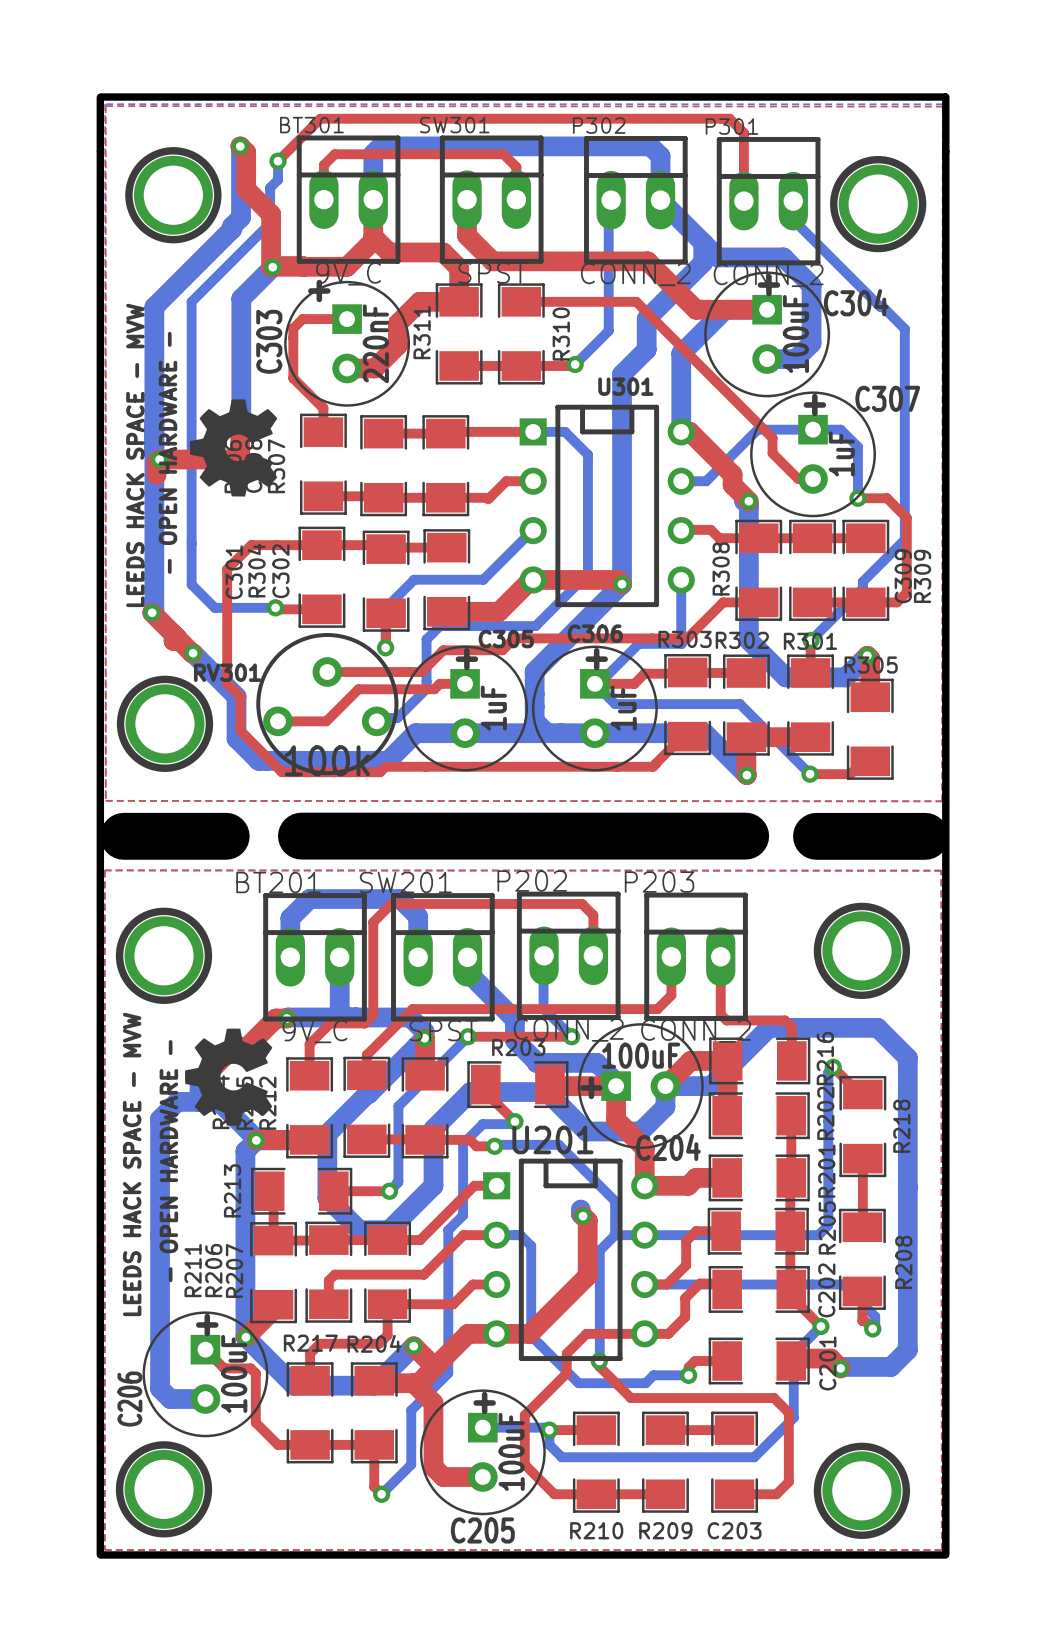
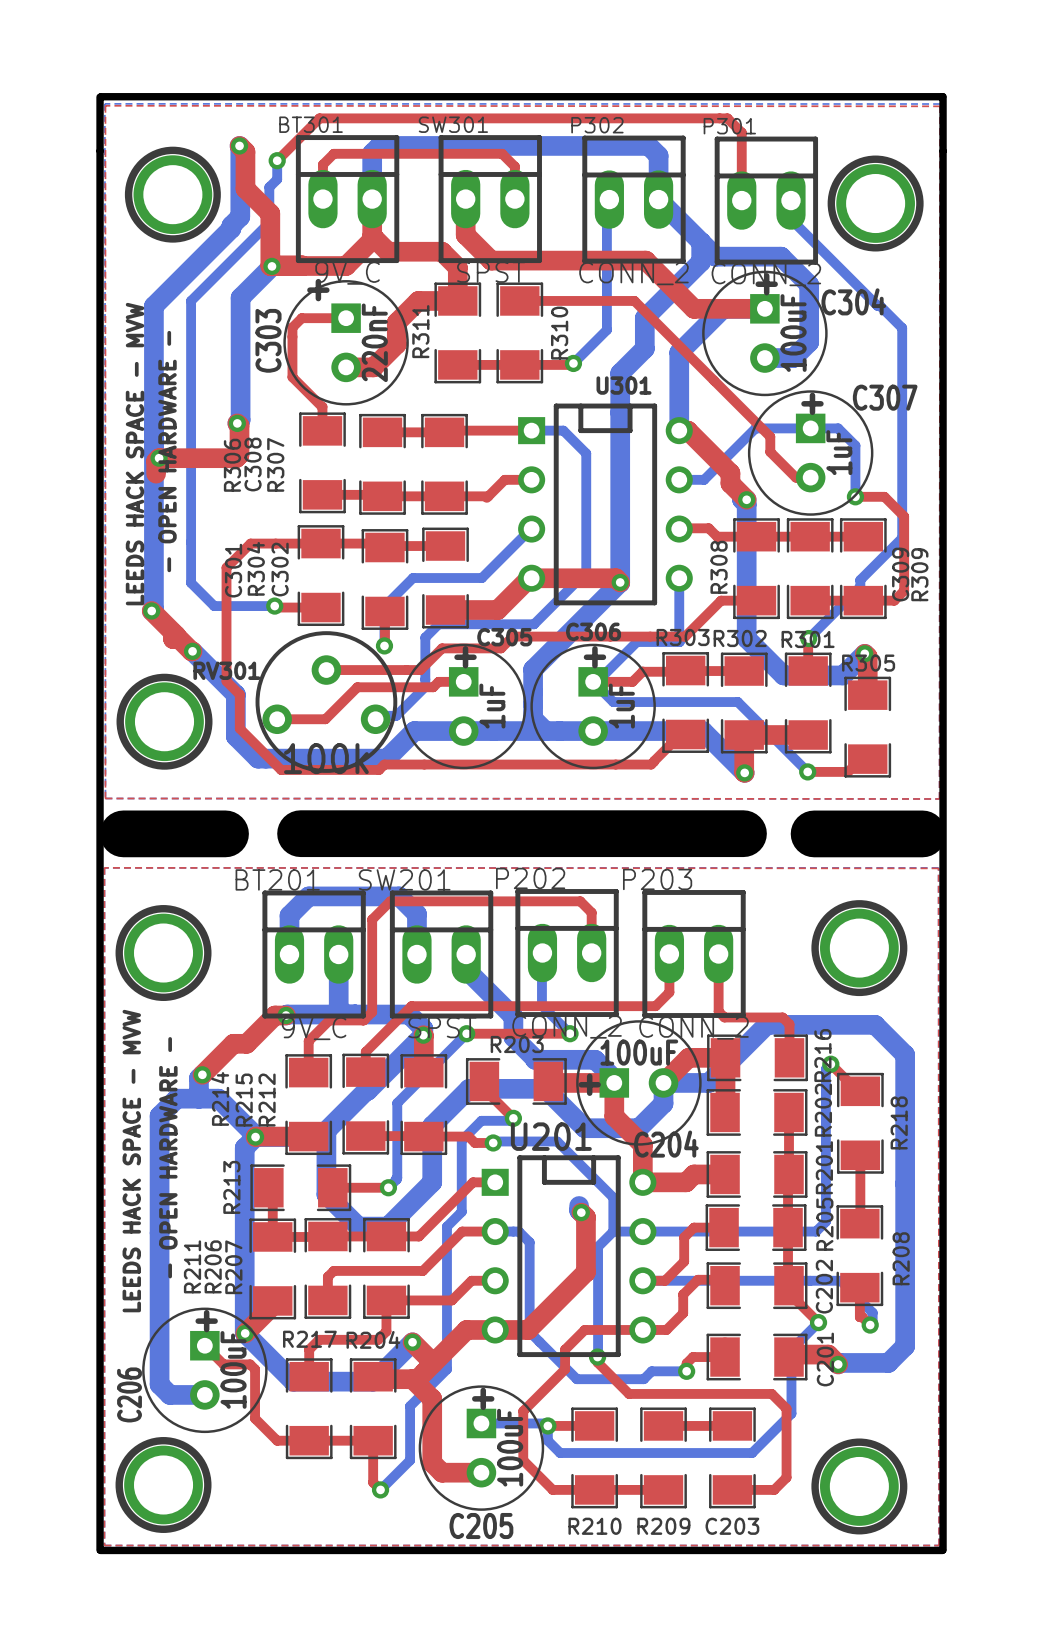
drawing: [189, 399, 278, 497] -> none
drawing: [185, 1028, 273, 1126] -> none

